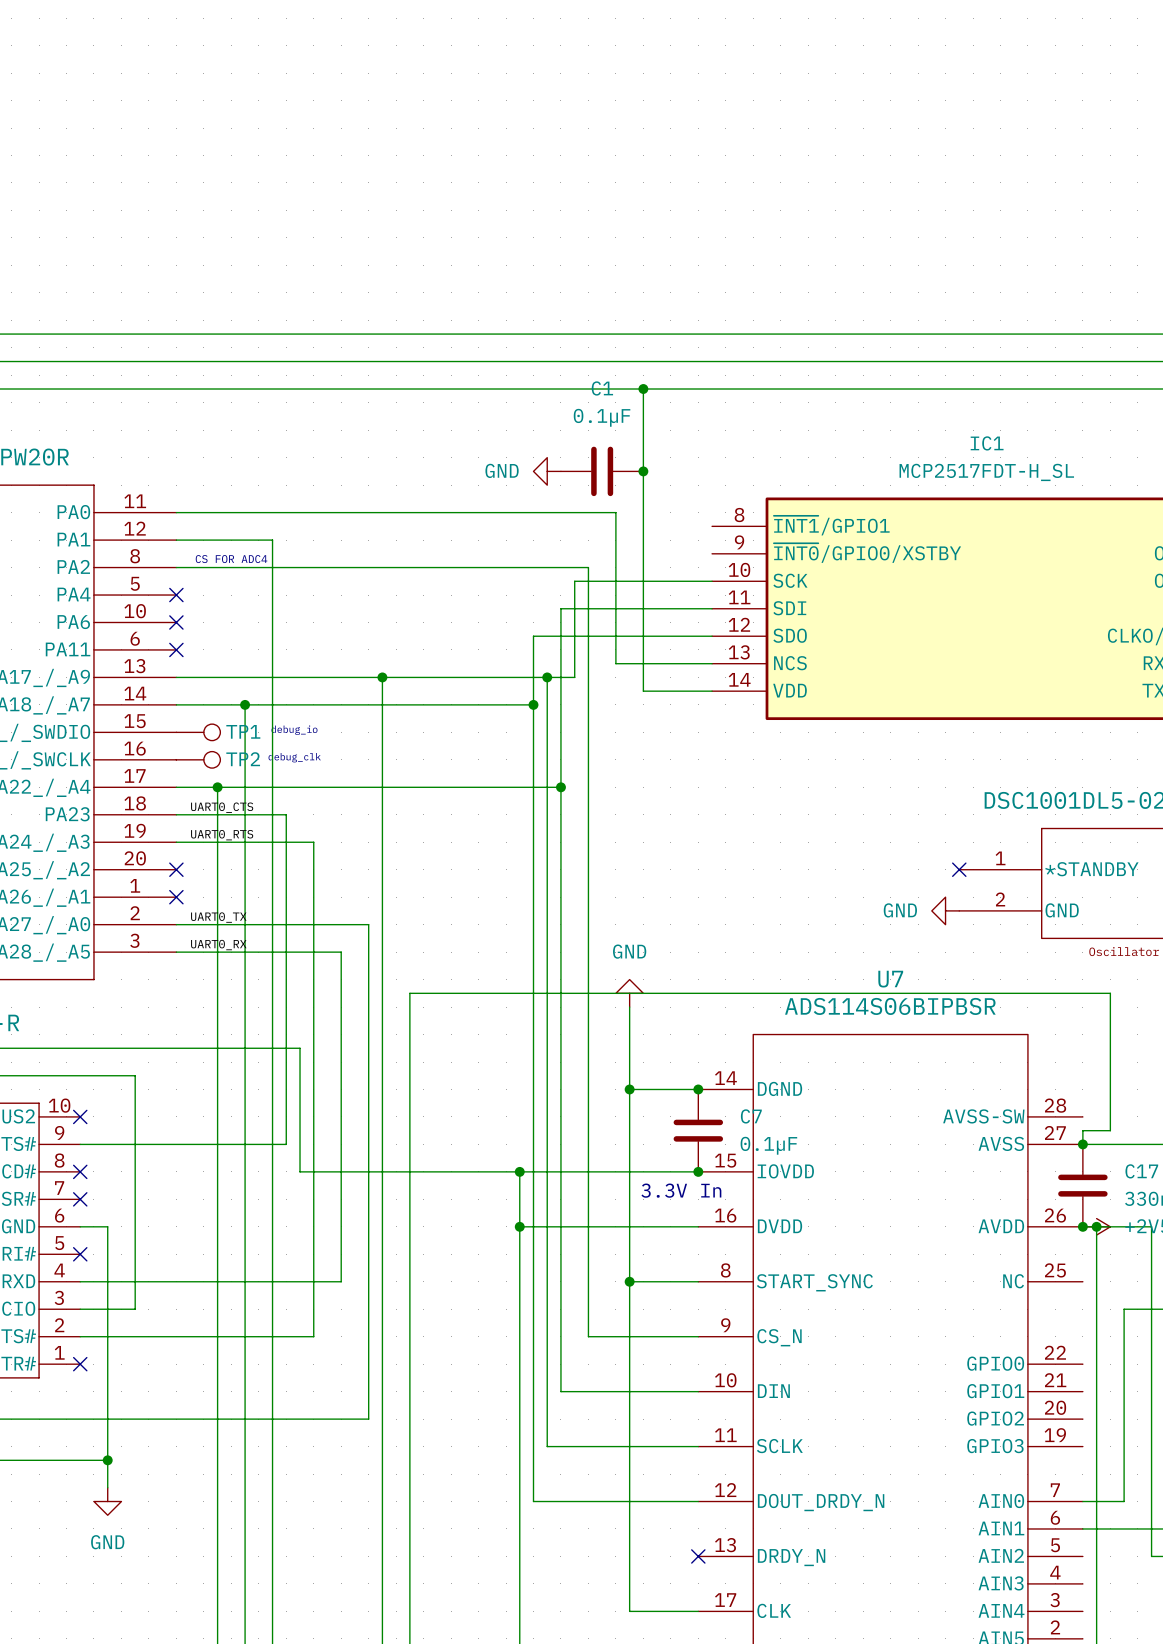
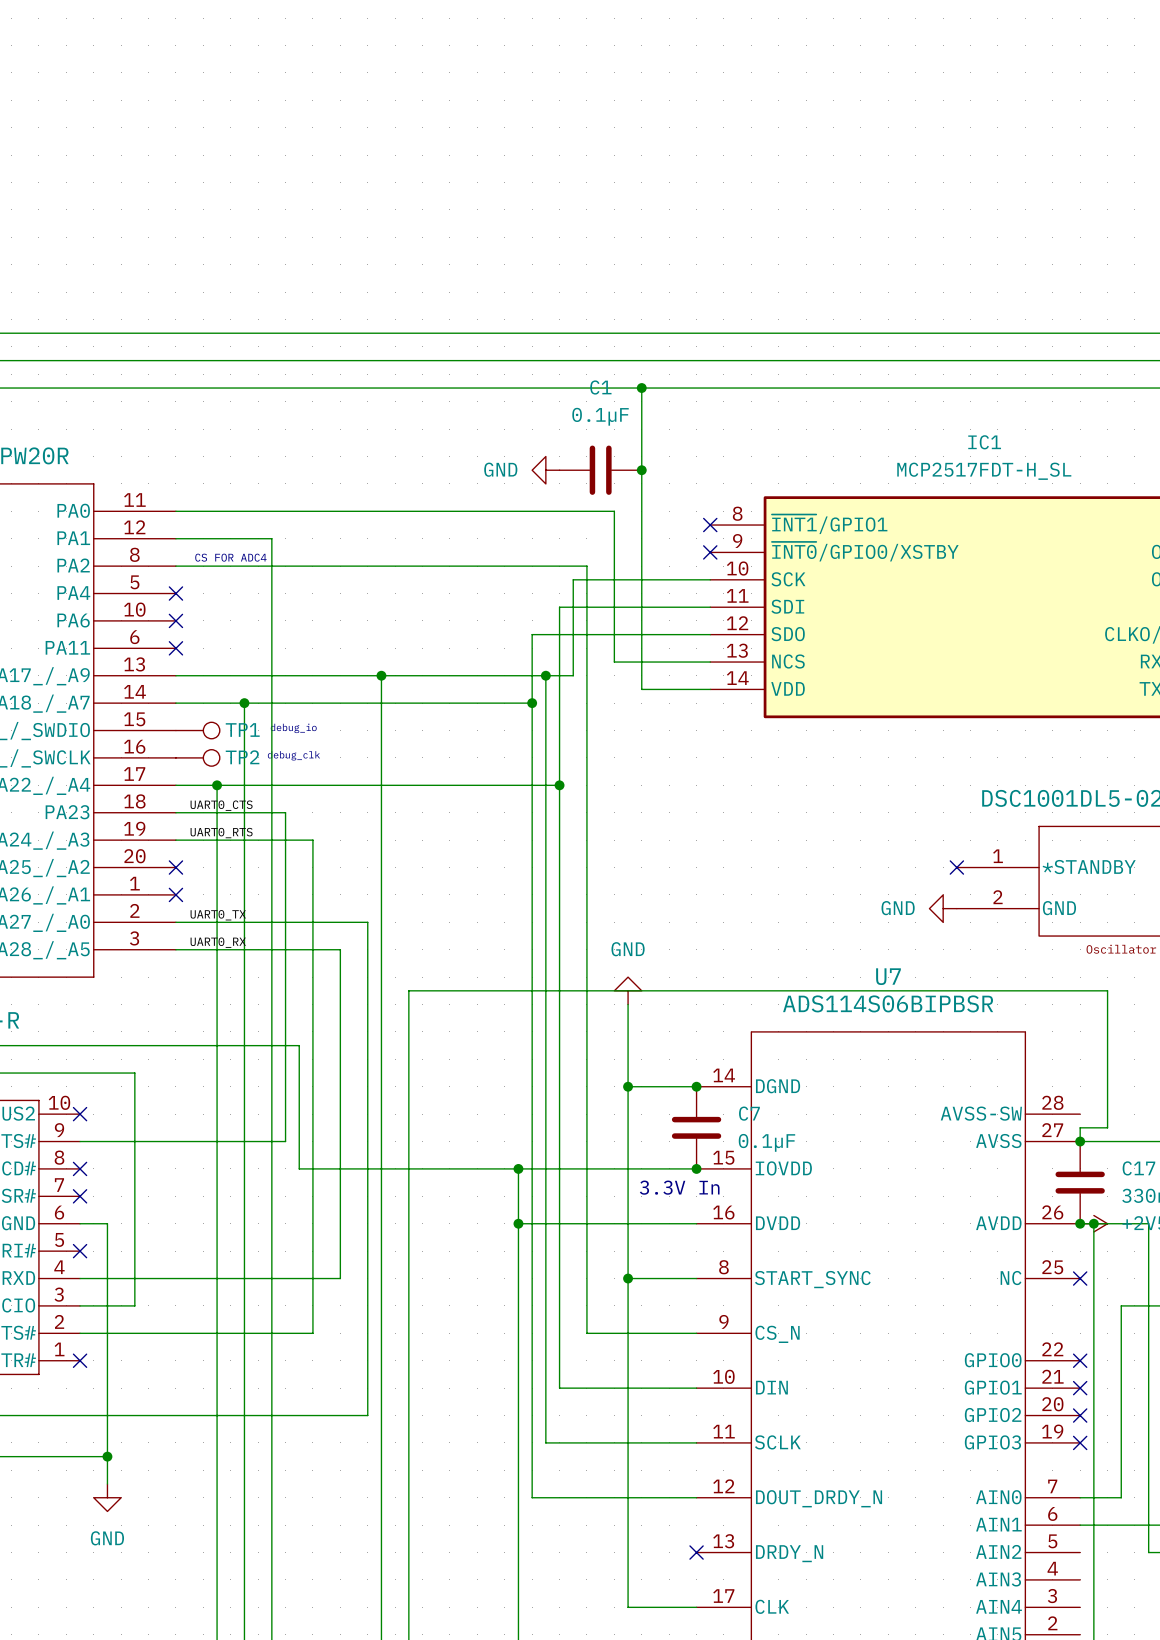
no-connect mark: none -> (710, 525)
no-connect mark: none -> (710, 552)
no-connect mark: none -> (1080, 1278)
no-connect mark: none -> (1080, 1360)
no-connect mark: none -> (1080, 1388)
no-connect mark: none -> (1080, 1415)
no-connect mark: none -> (1080, 1442)

